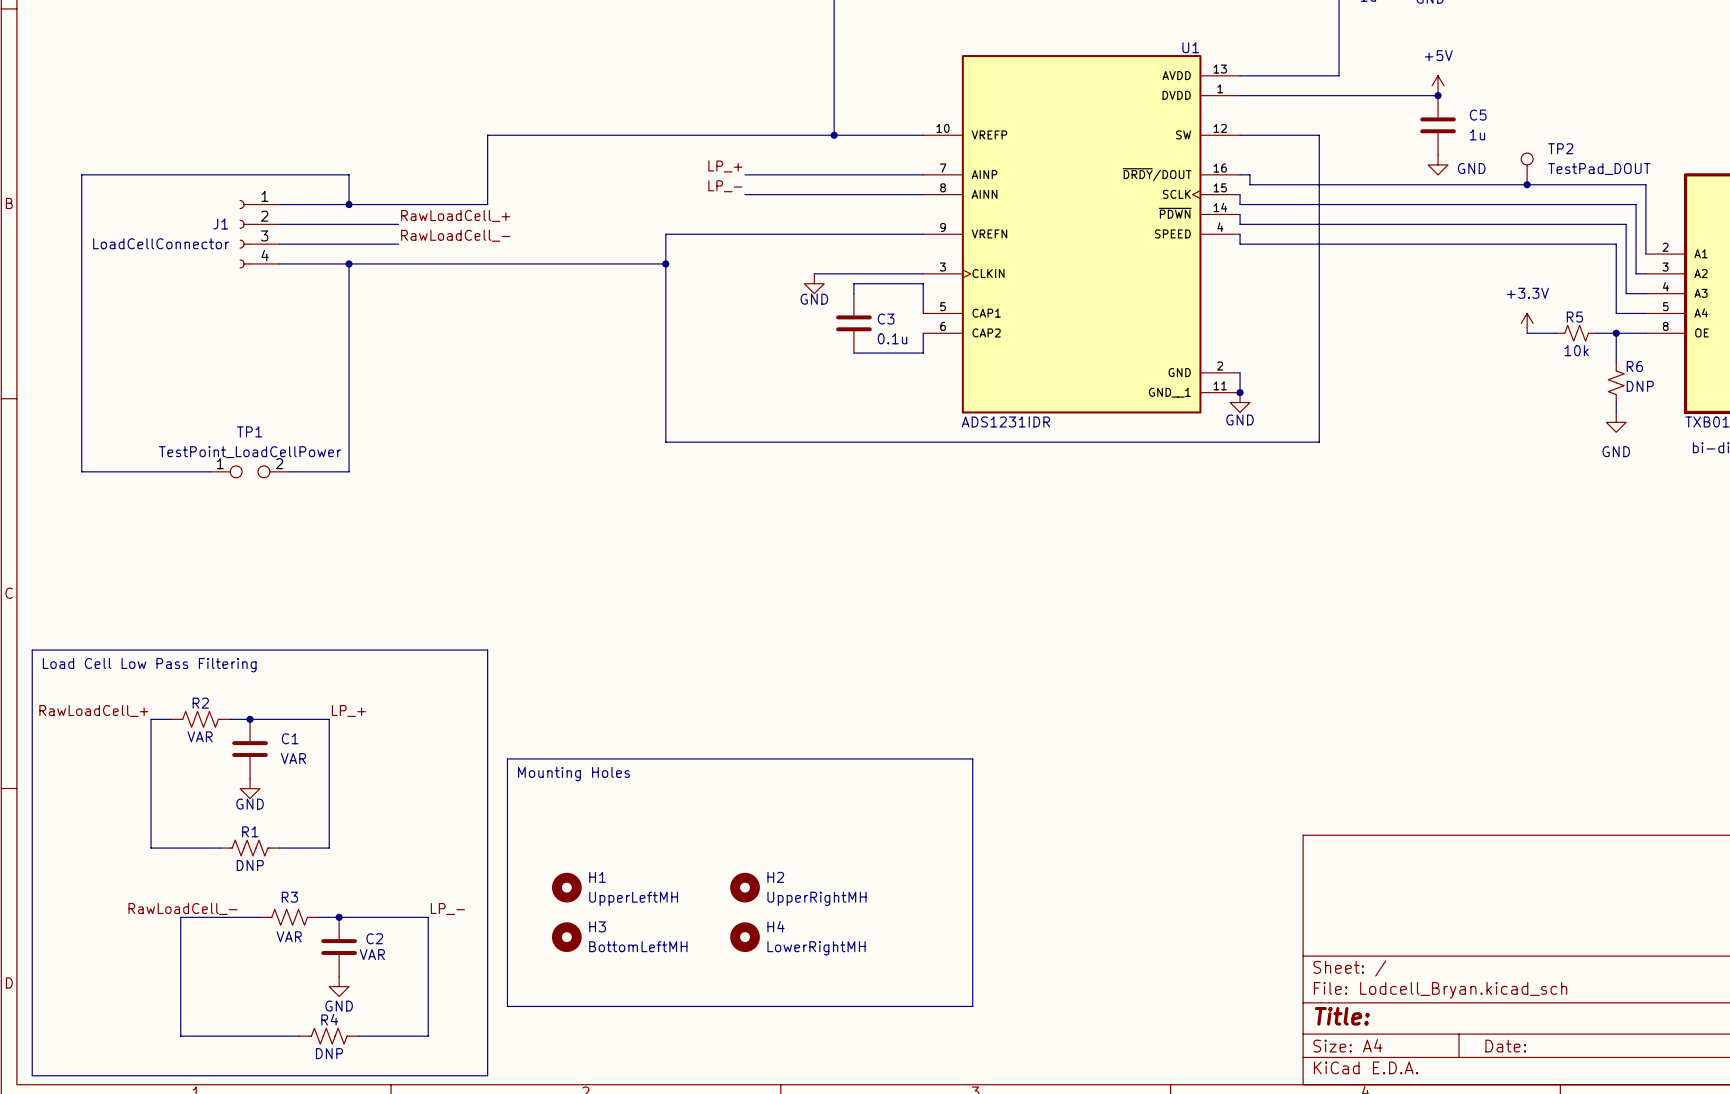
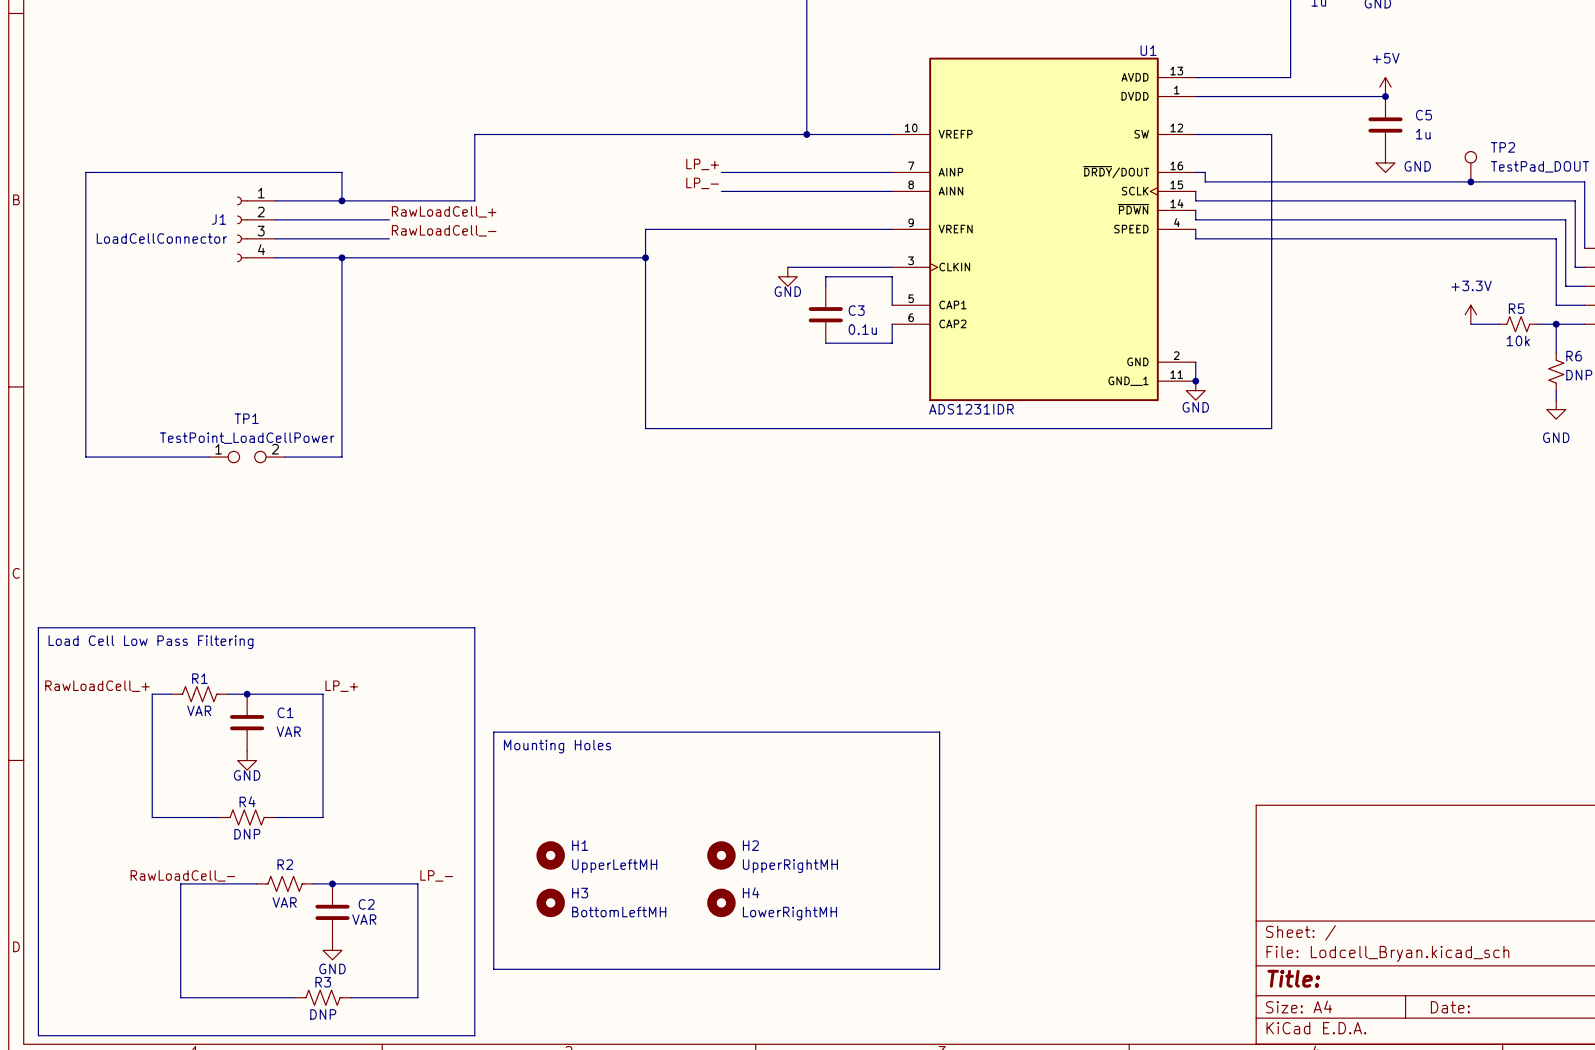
R2 name: R2 (200, 703) -> R1 (199, 678)
R1 name: R1 (250, 831) -> R4 (247, 801)
R3 name: R3 (289, 897) -> R2 (285, 864)
R4 name: R4 (329, 1019) -> R3 (323, 982)

